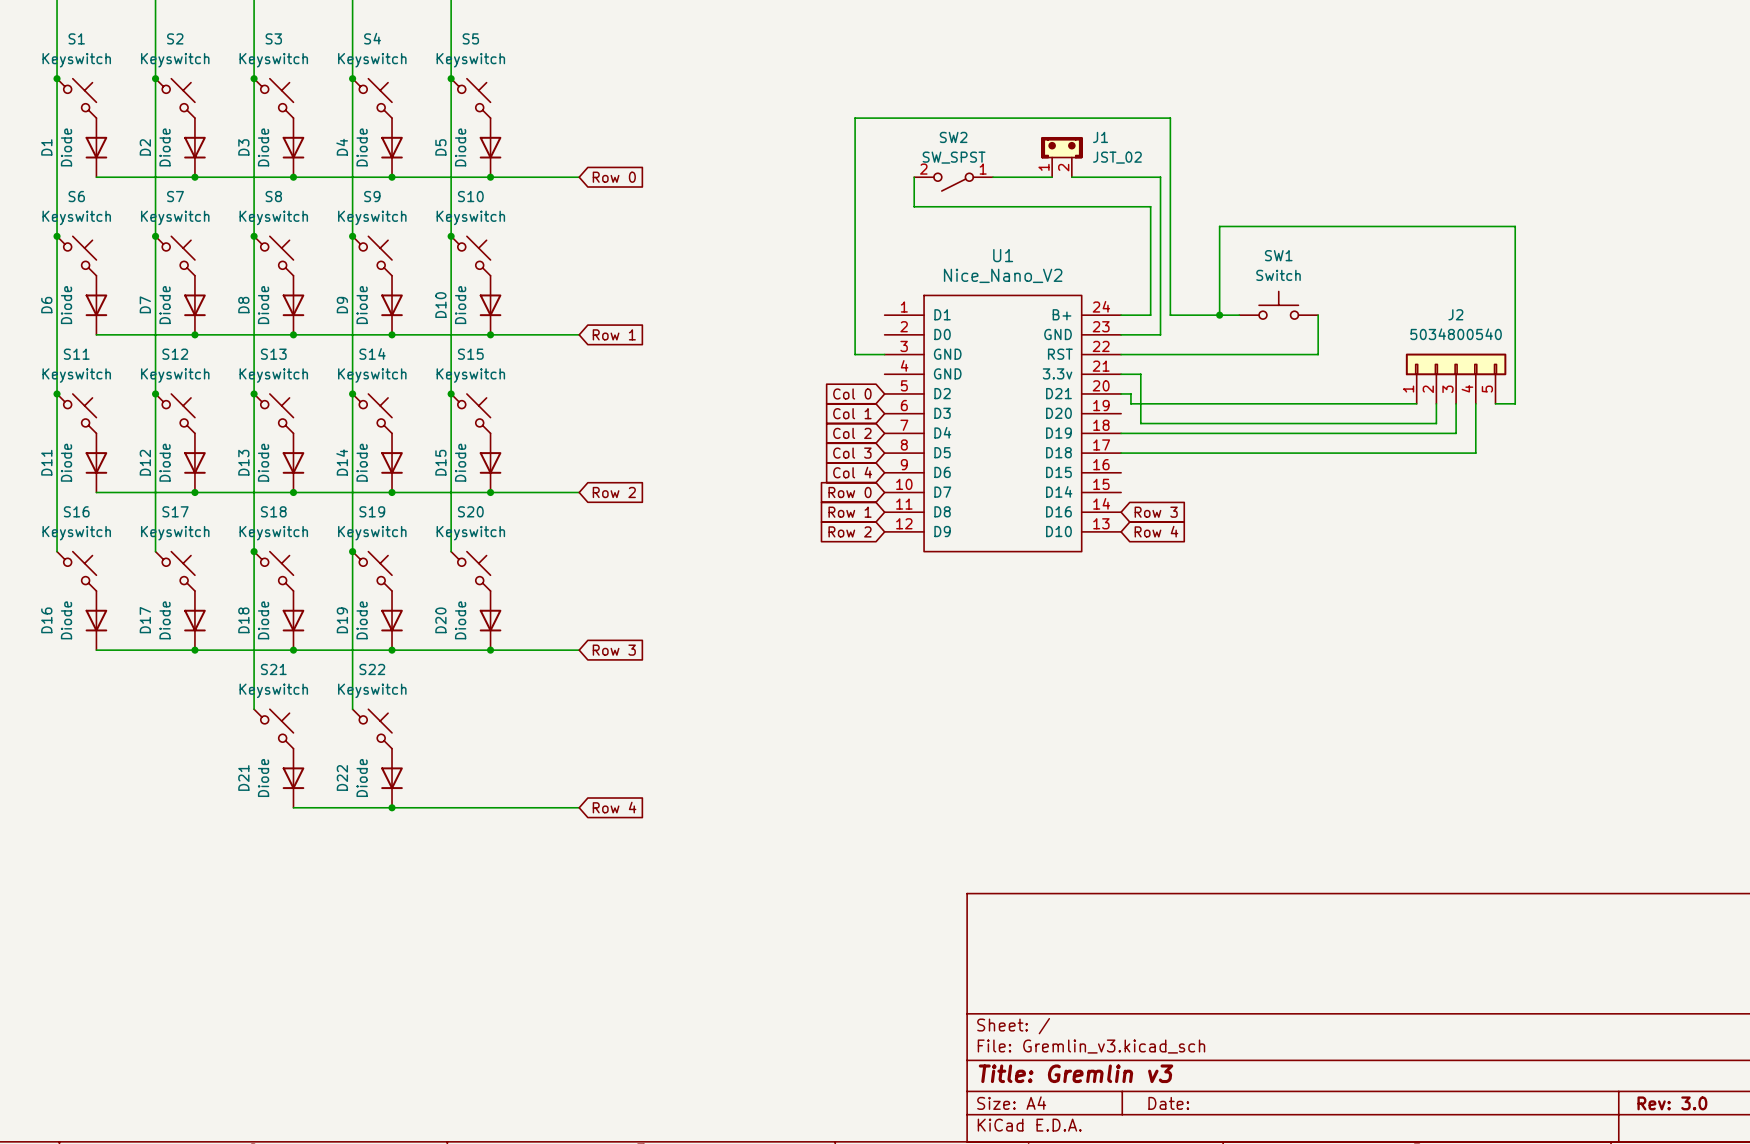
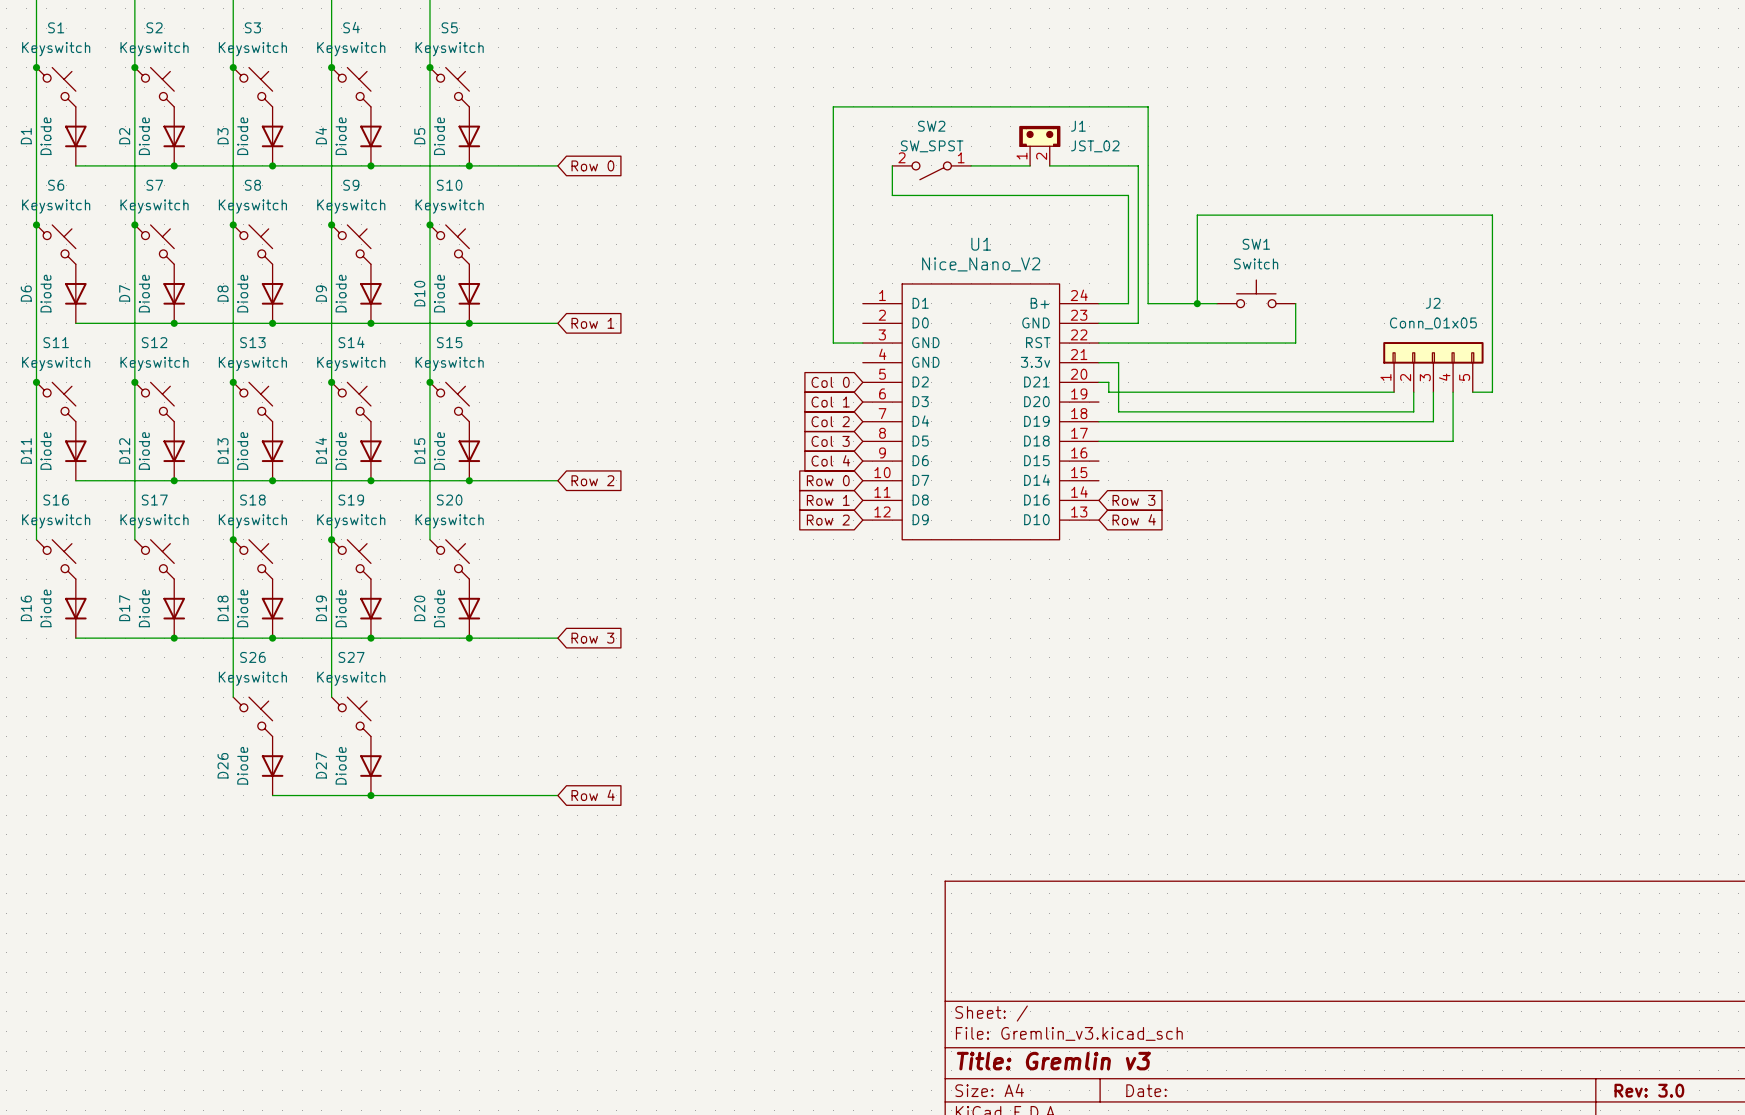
J2 value: 5034800540 (1456, 334) -> Conn_01x05 (1433, 323)
S21 name: S21 (273, 669) -> S26 (252, 657)
S22 name: S22 (372, 669) -> S27 (351, 657)
D21 name: D21 (243, 777) -> D26 (223, 765)
D22 name: D22 (342, 777) -> D27 (321, 765)

